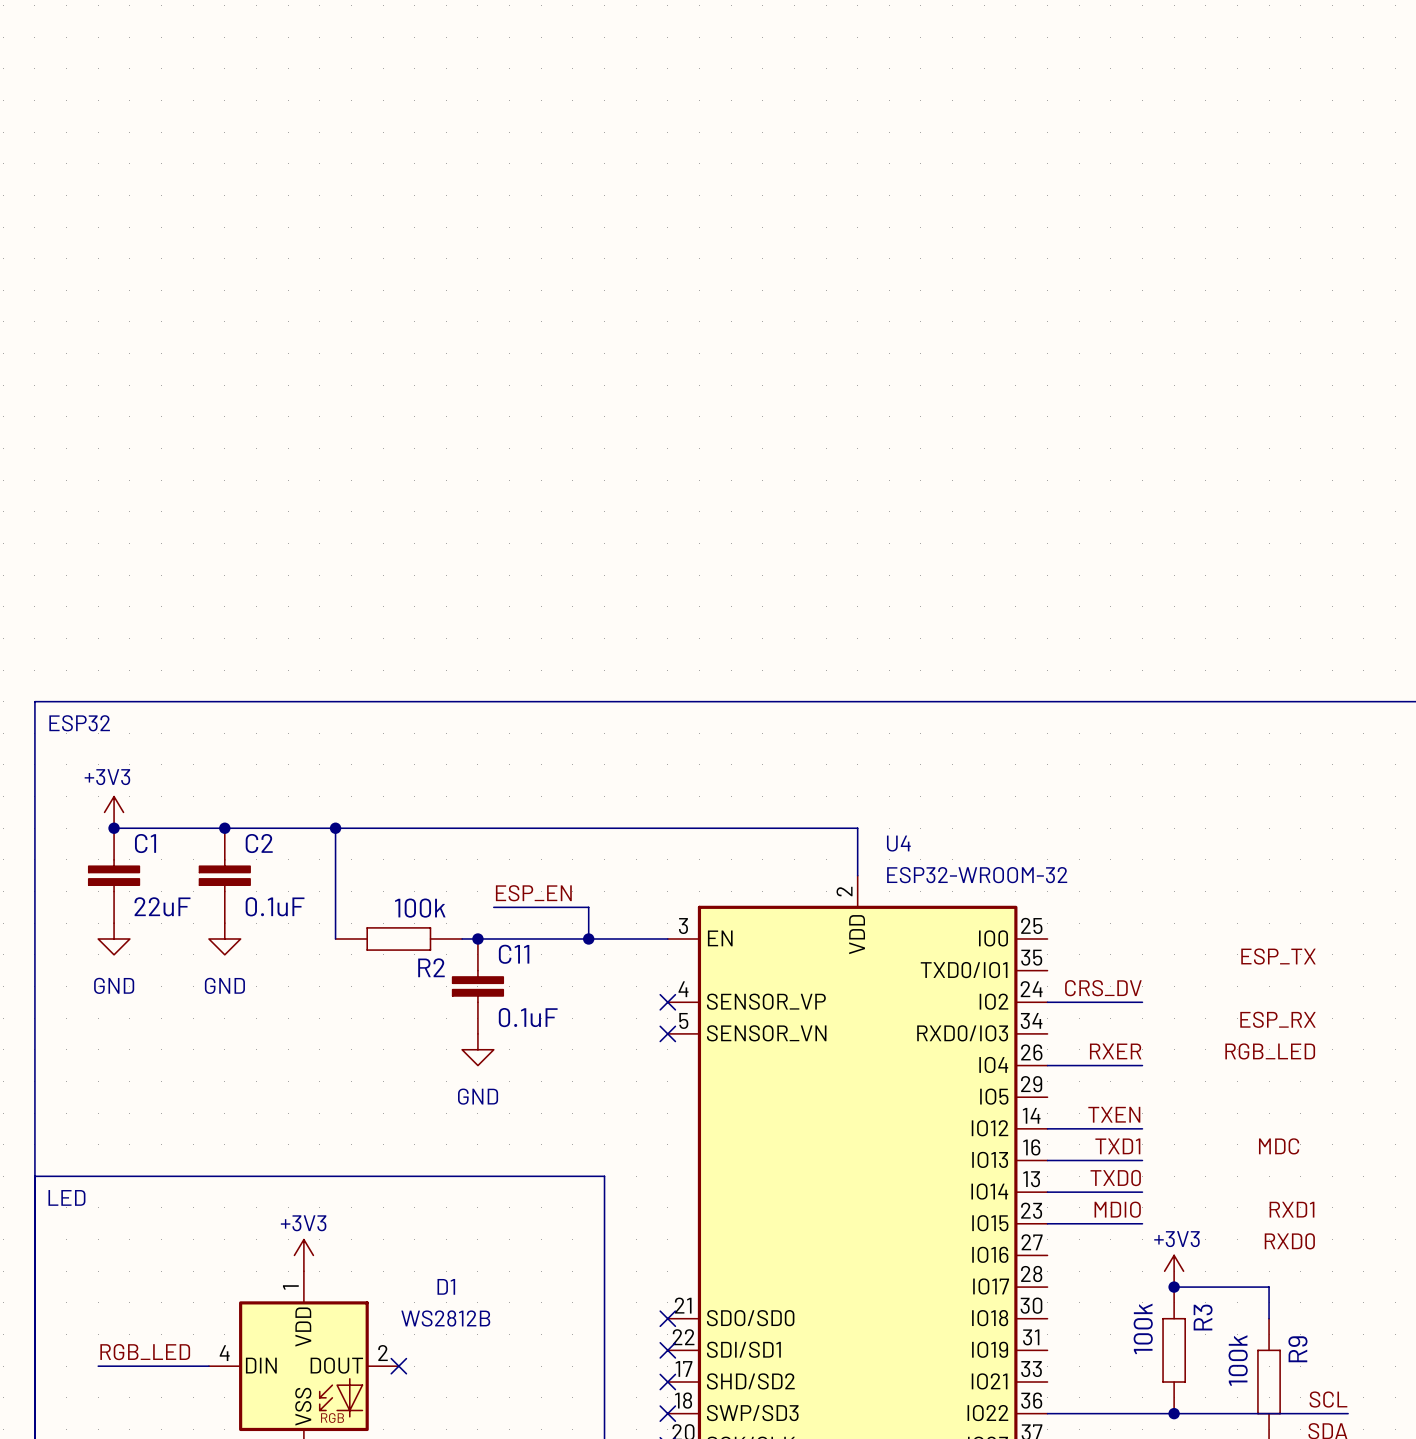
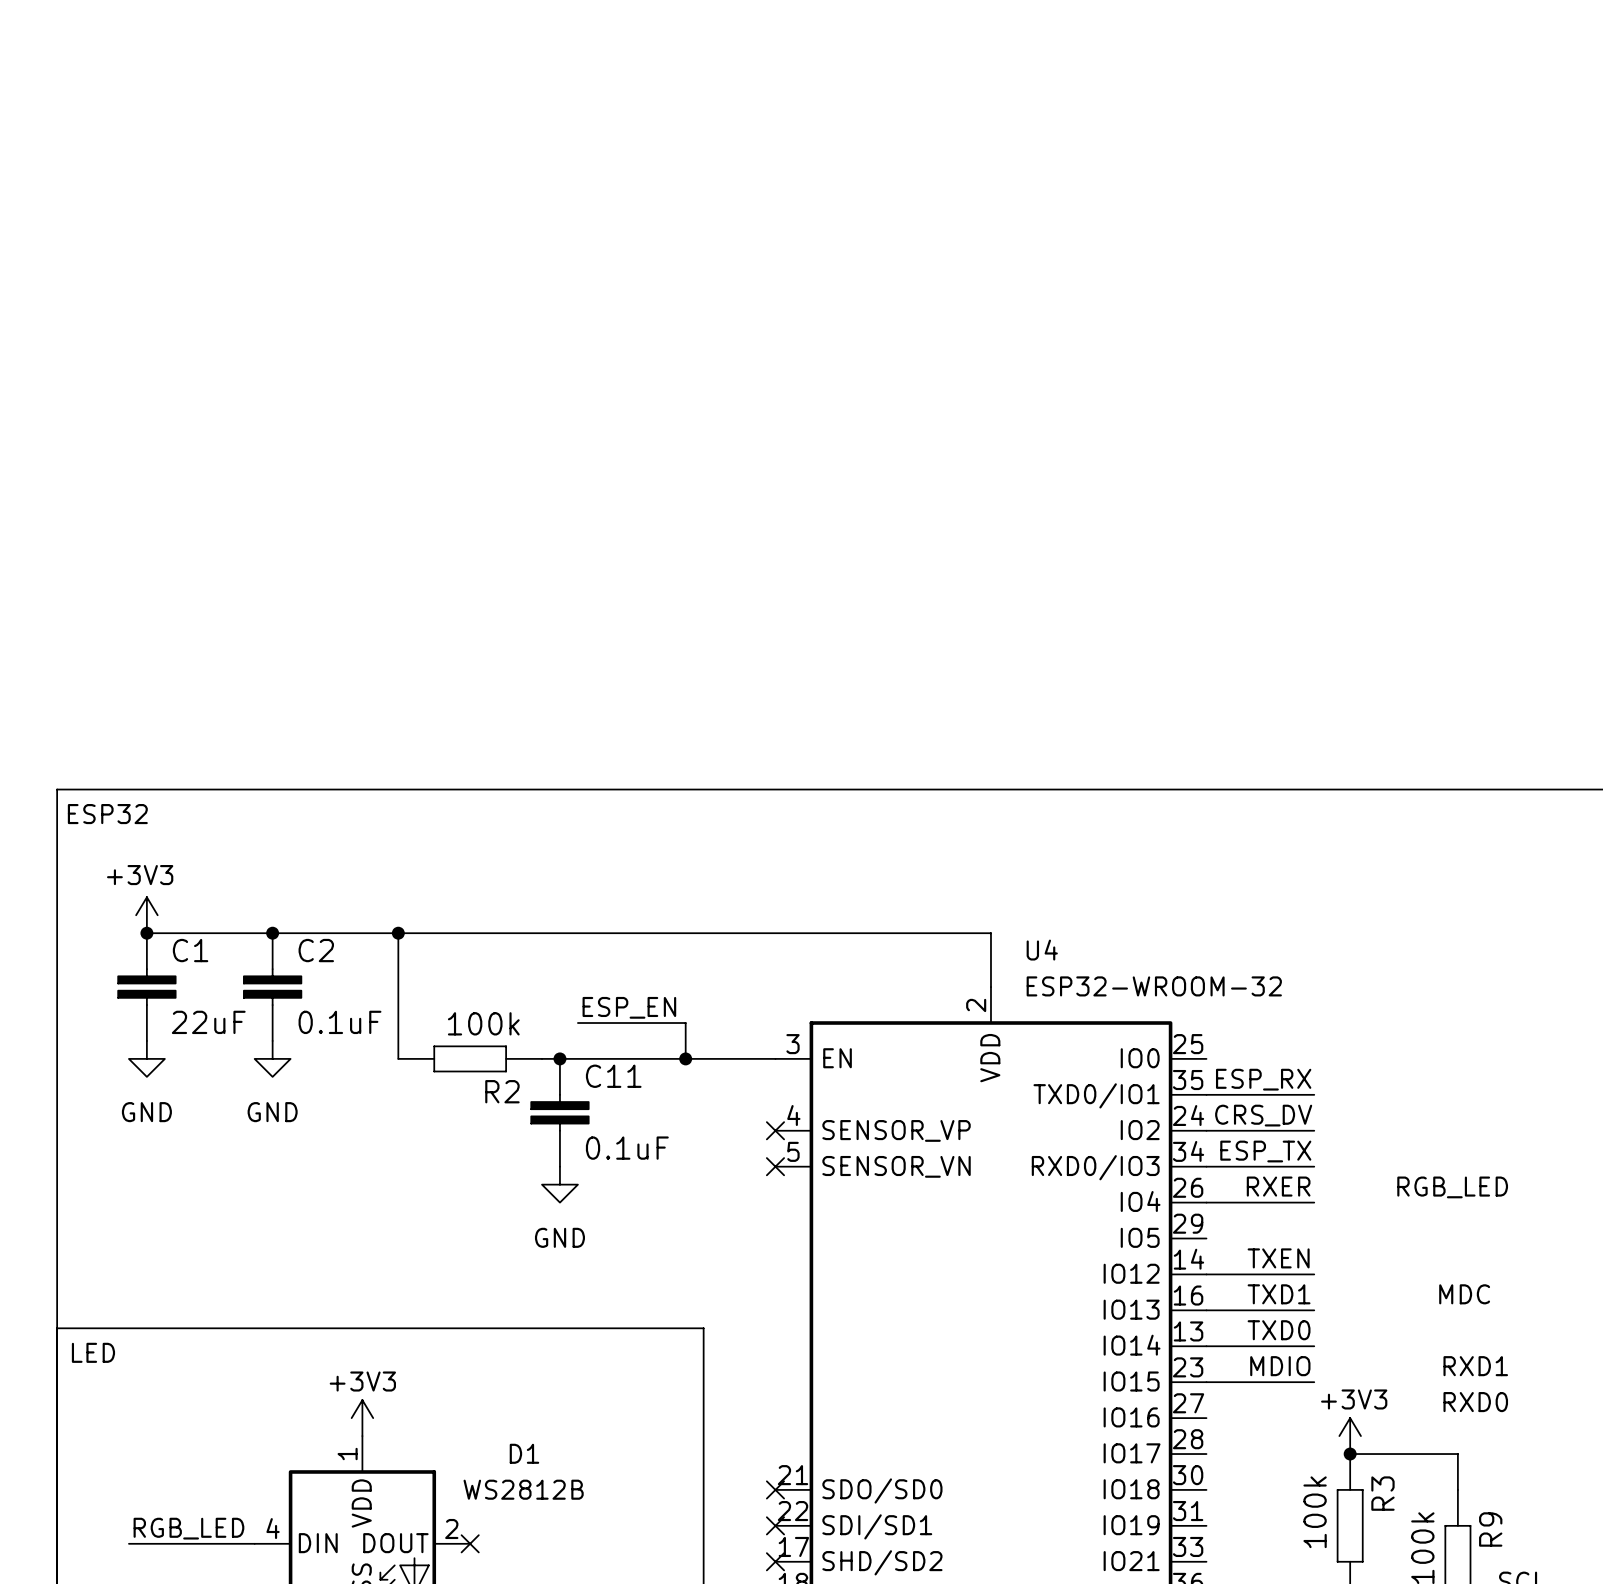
label position: ESP_TX (1278, 956) -> ESP_TX (1265, 1151)
wire: none -> (1206, 1094) (1314, 1094)
label position: ESP_RX (1277, 1019) -> ESP_RX (1263, 1079)
wire: none -> (1206, 1166) (1314, 1166)

